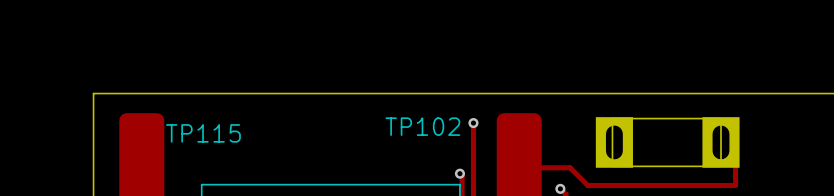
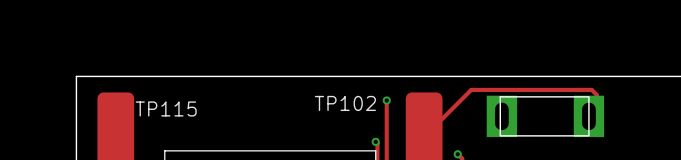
track: (721, 142) (721, 147) (735, 162) (735, 185) (587, 185) (570, 167) (519, 167) -> (588, 118) (596, 109) (596, 95) (591, 89) (471, 89) (424, 137)

